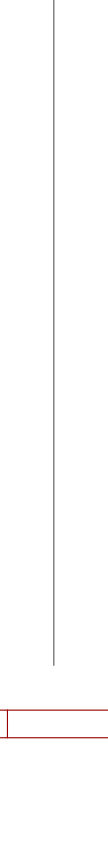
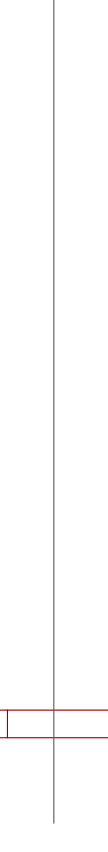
line: none -> (53, 665) (53, 823)

